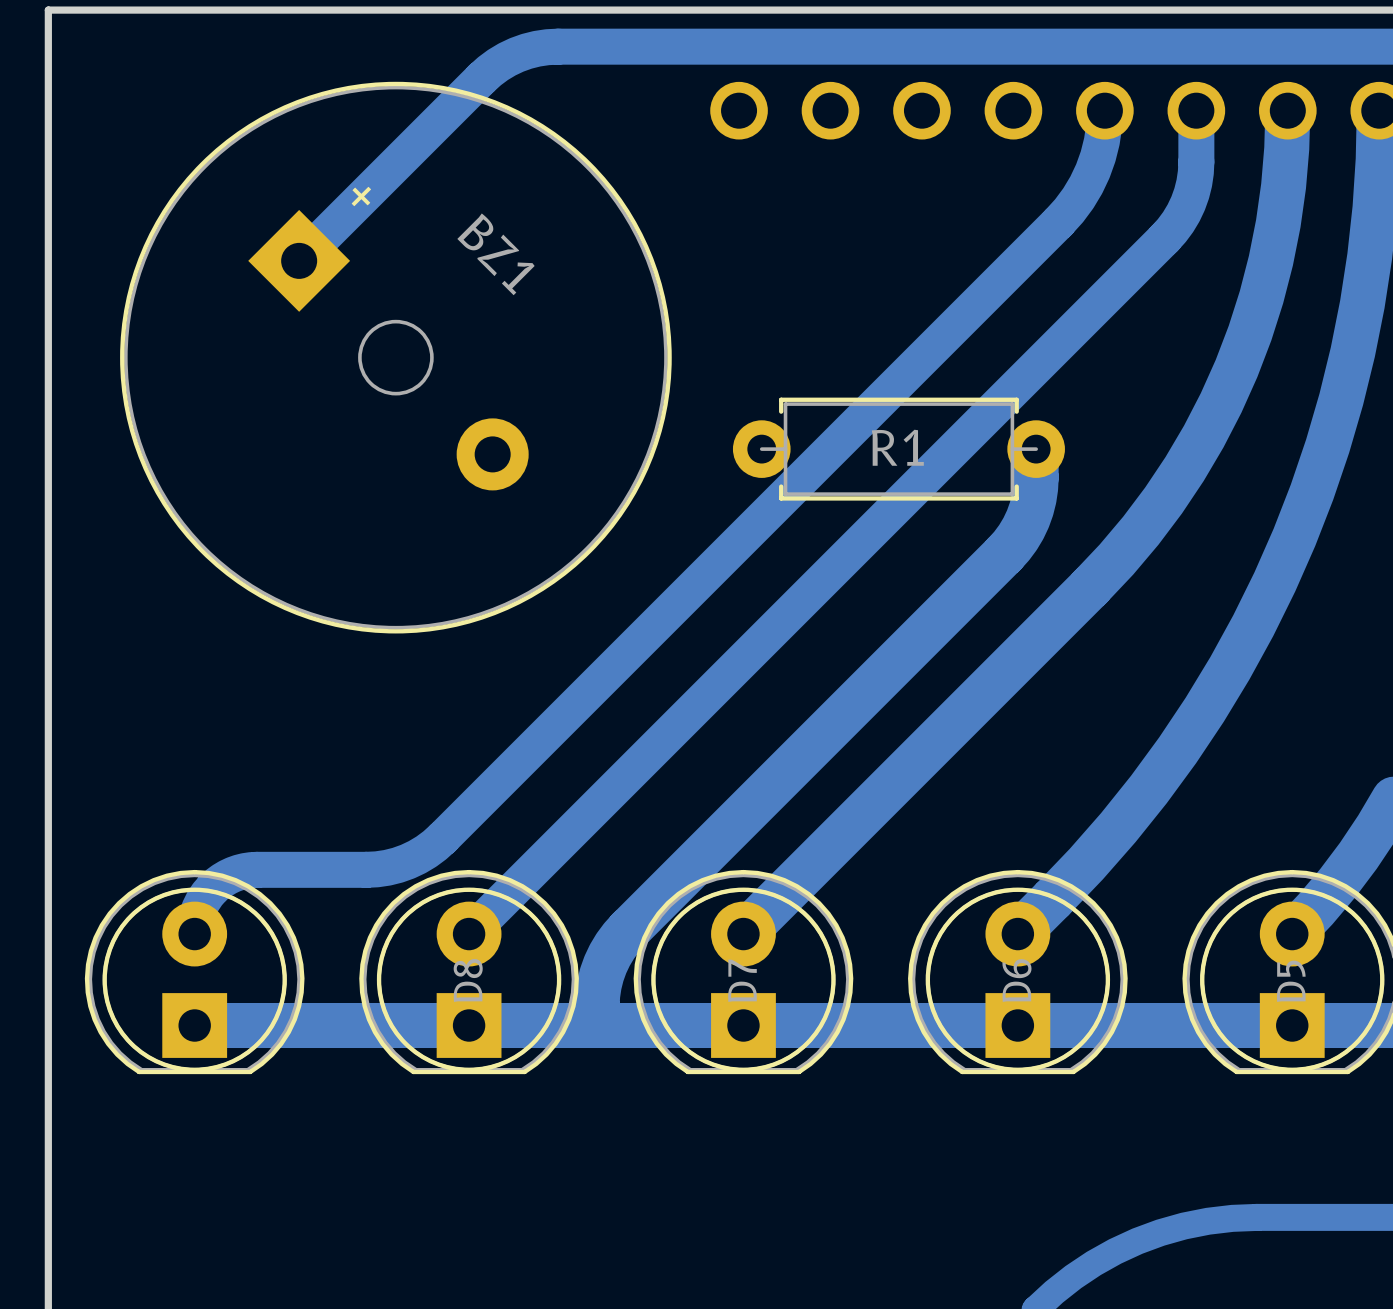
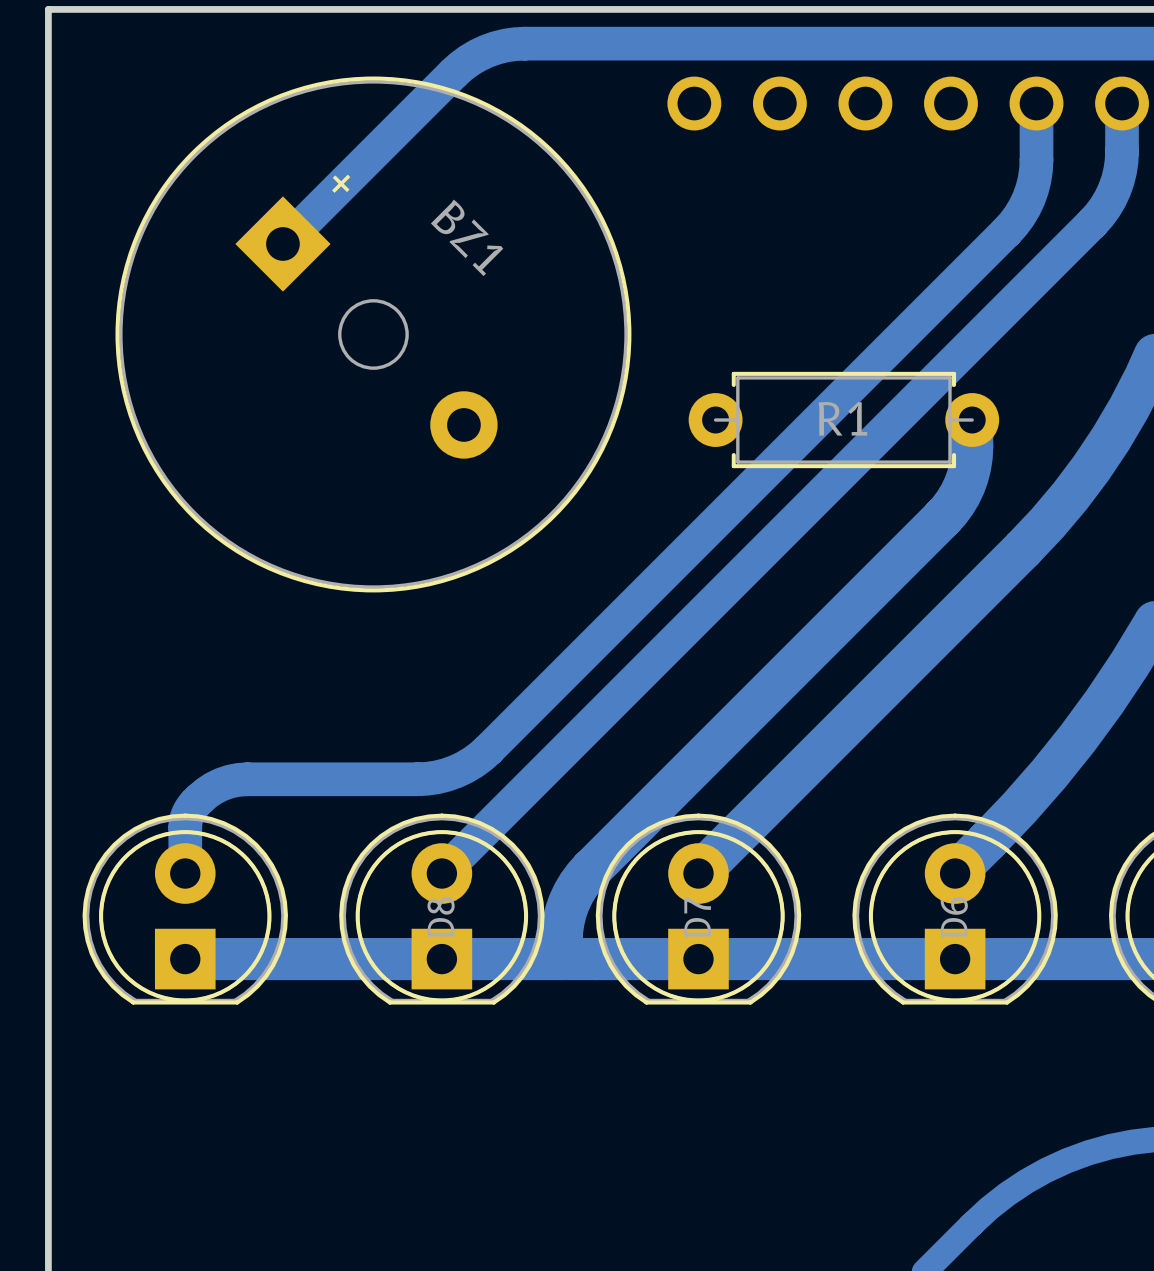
bottom track: (1104, 110) (1101, 141) (1092, 171) (1078, 198) (1058, 222) (434, 845) (407, 861) (376, 869) (257, 869) (233, 874) (217, 884) (207, 894) (196, 916) (194, 932) -> (1036, 103) (1034, 179) (1024, 207) (1013, 224) (481, 756) (455, 771) (427, 778) (247, 779) (221, 784) (199, 799) (187, 814) (185, 827) (185, 871)

